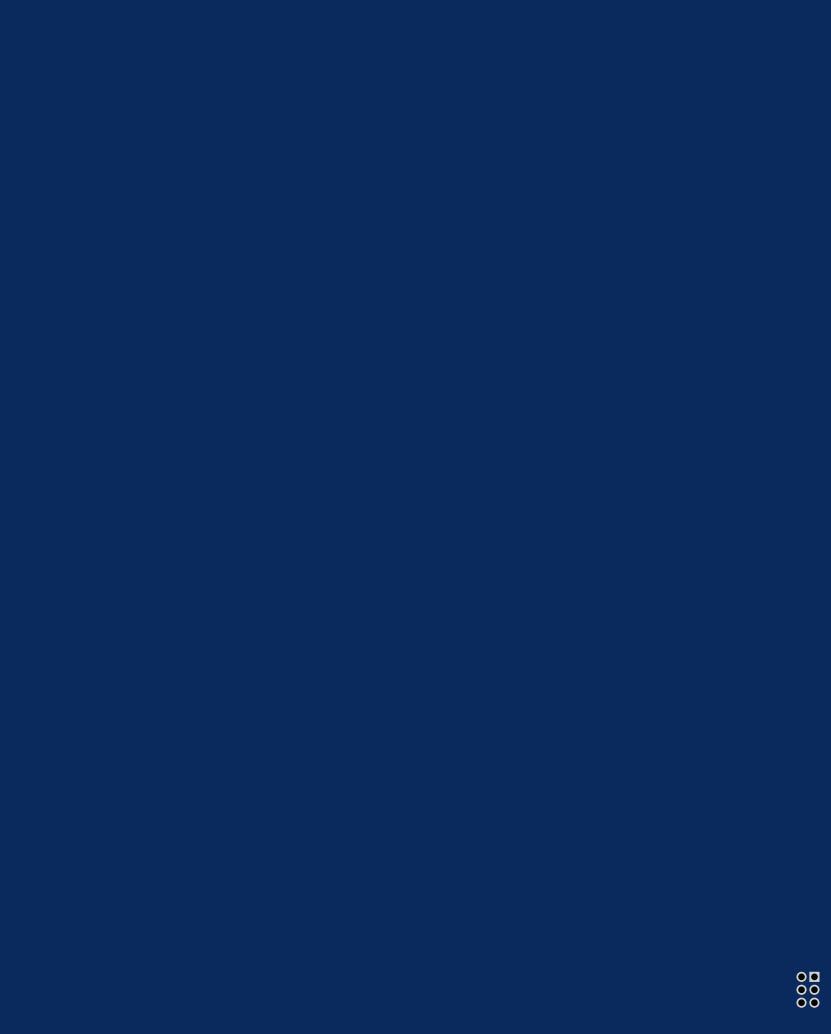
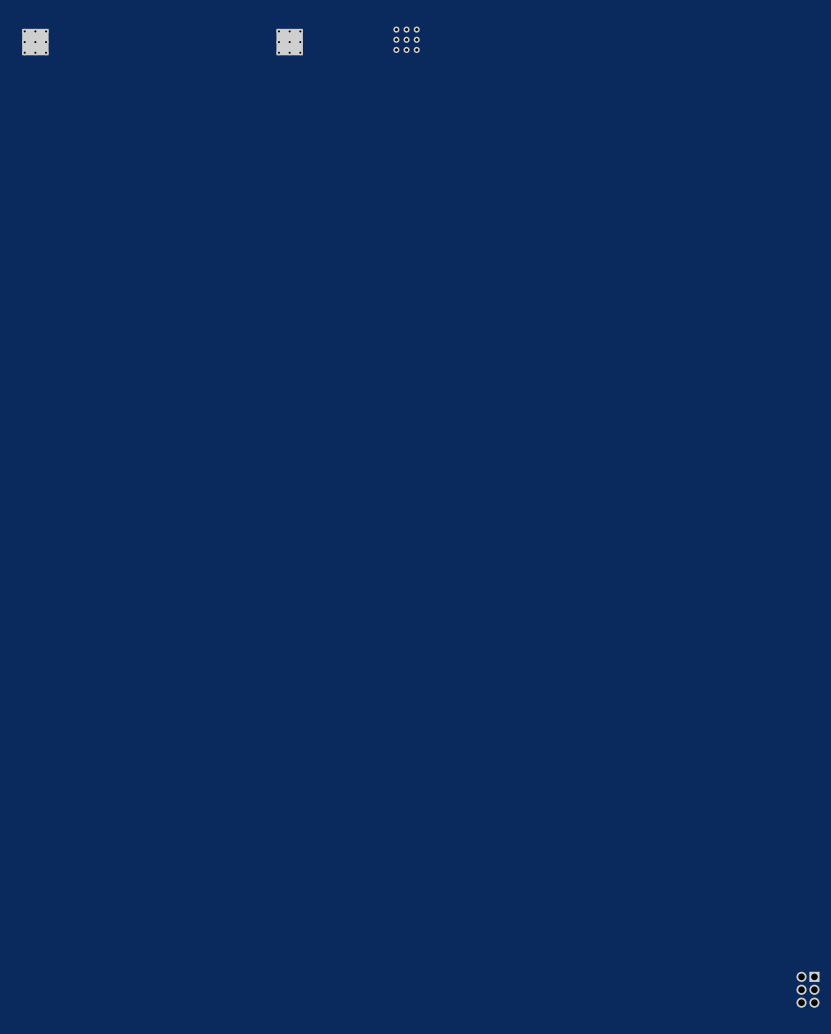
part: none -> (406, 39)
part: none -> (35, 42)
part: none -> (289, 42)

